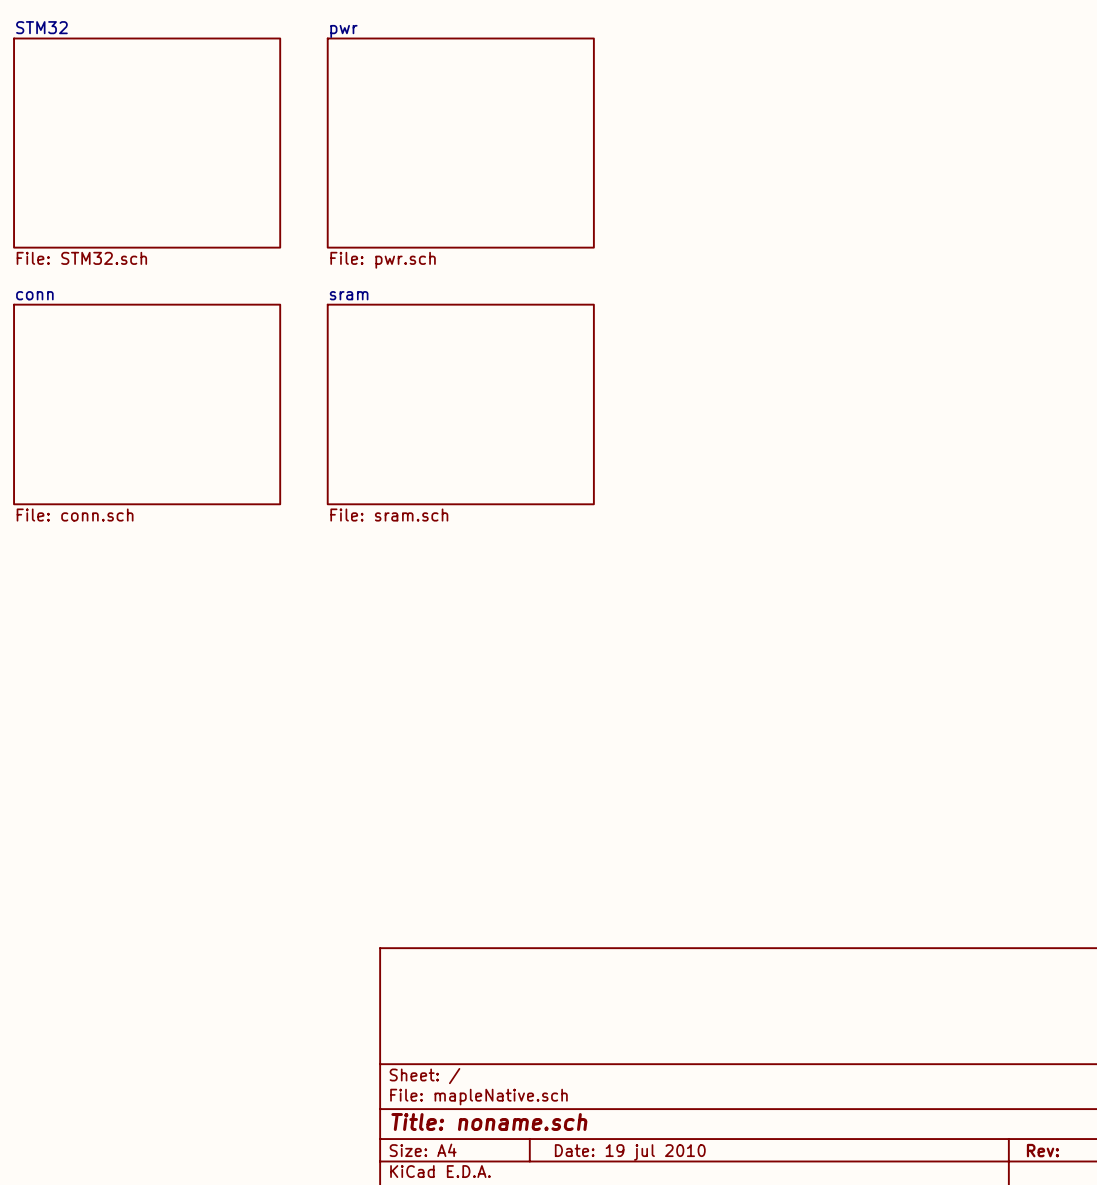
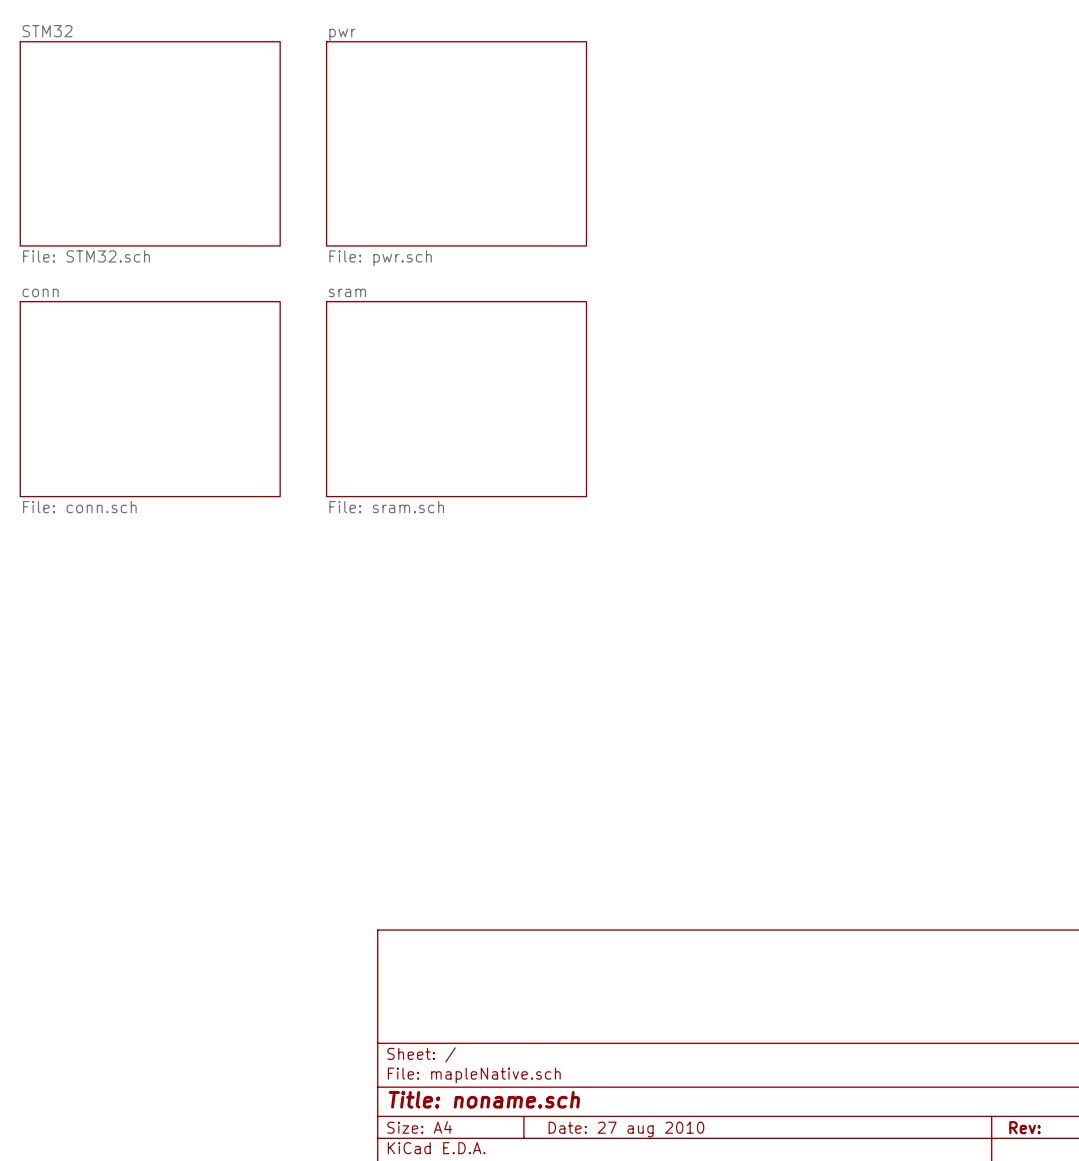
title block: Date: 19 jul 2010 (630, 1152) -> Date: 27 aug 2010 (626, 1129)

